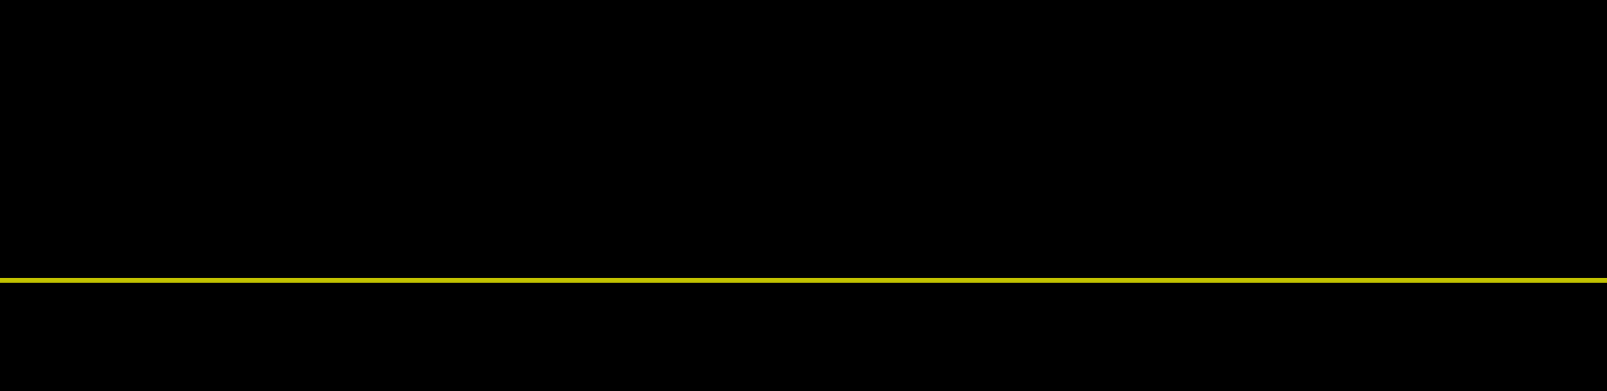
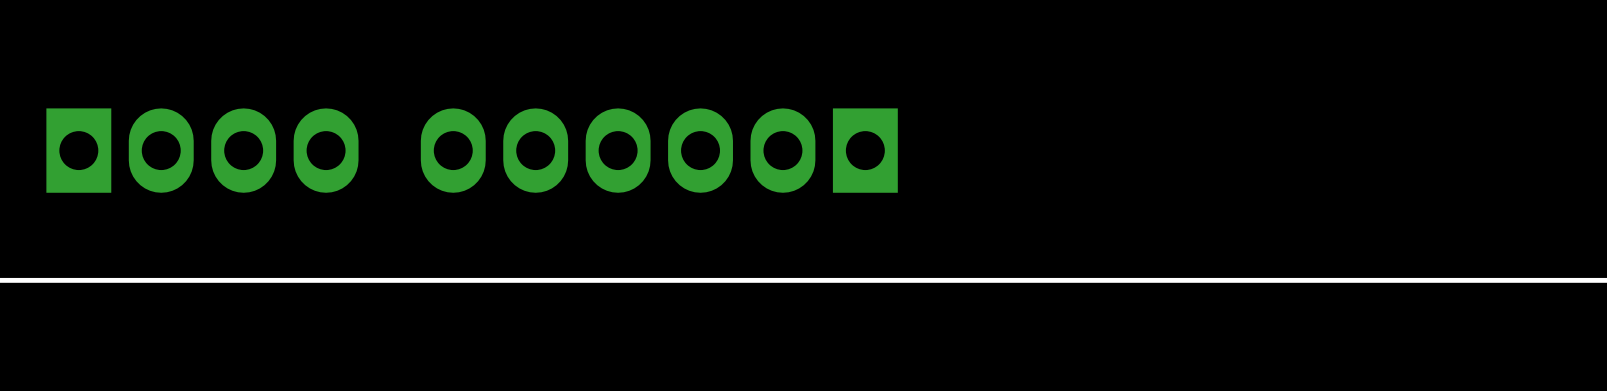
part: none -> (202, 150)
part: none -> (659, 150)

